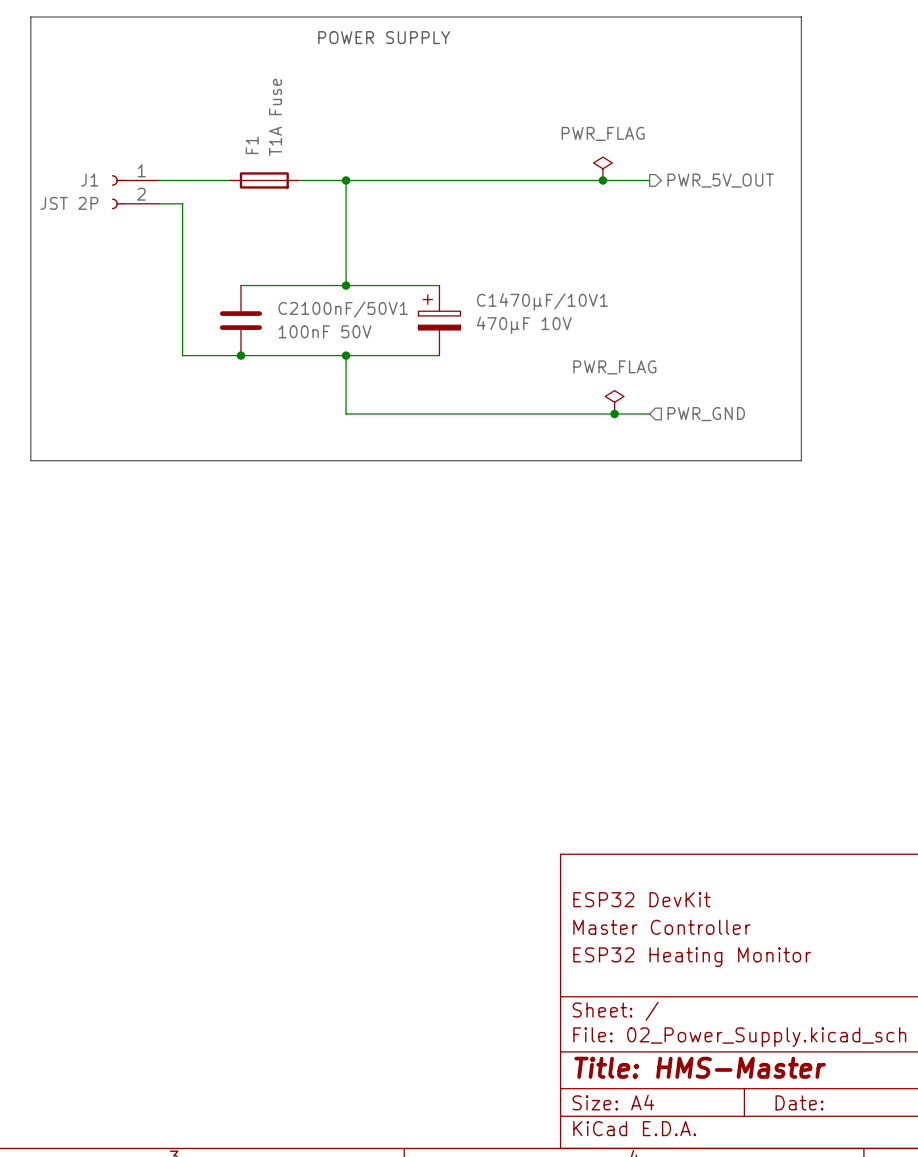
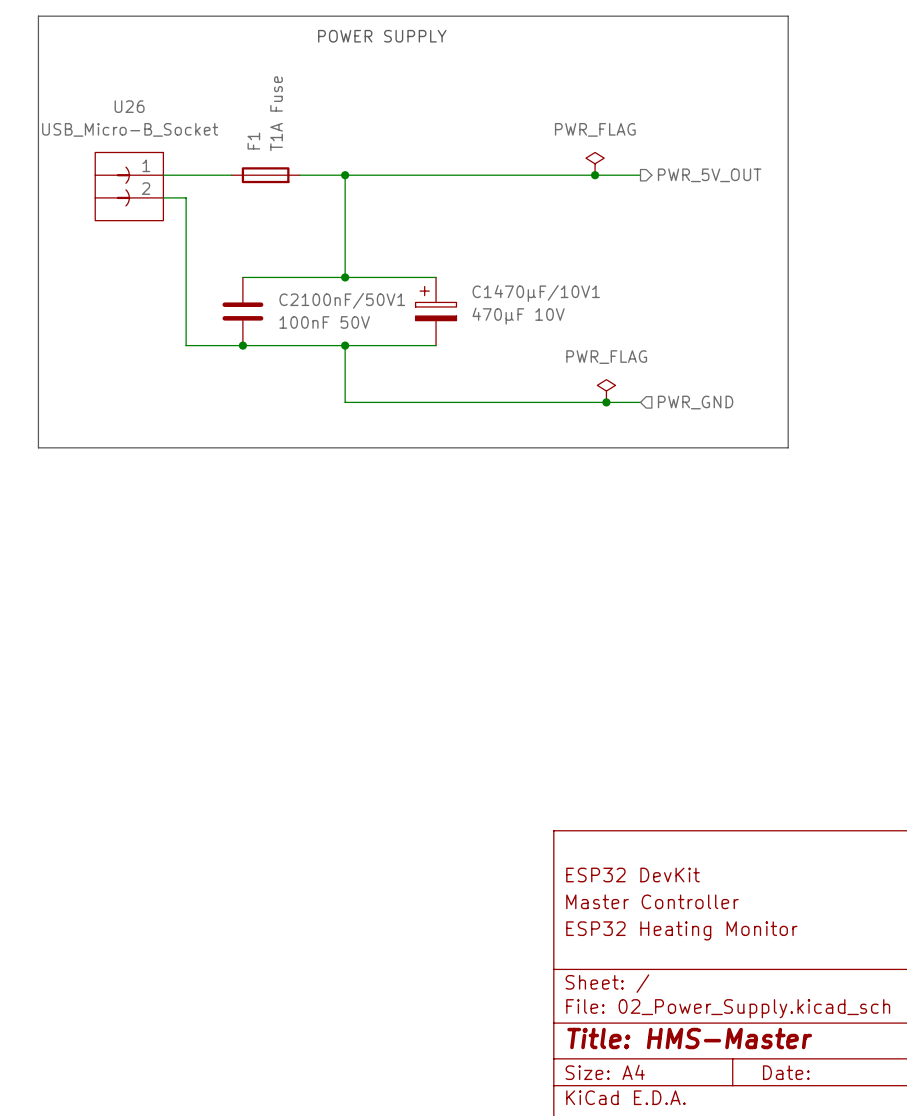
U26: none -> USB_Micro-B_Socket (129, 186)
J1: JST 2P (135, 192) -> none

